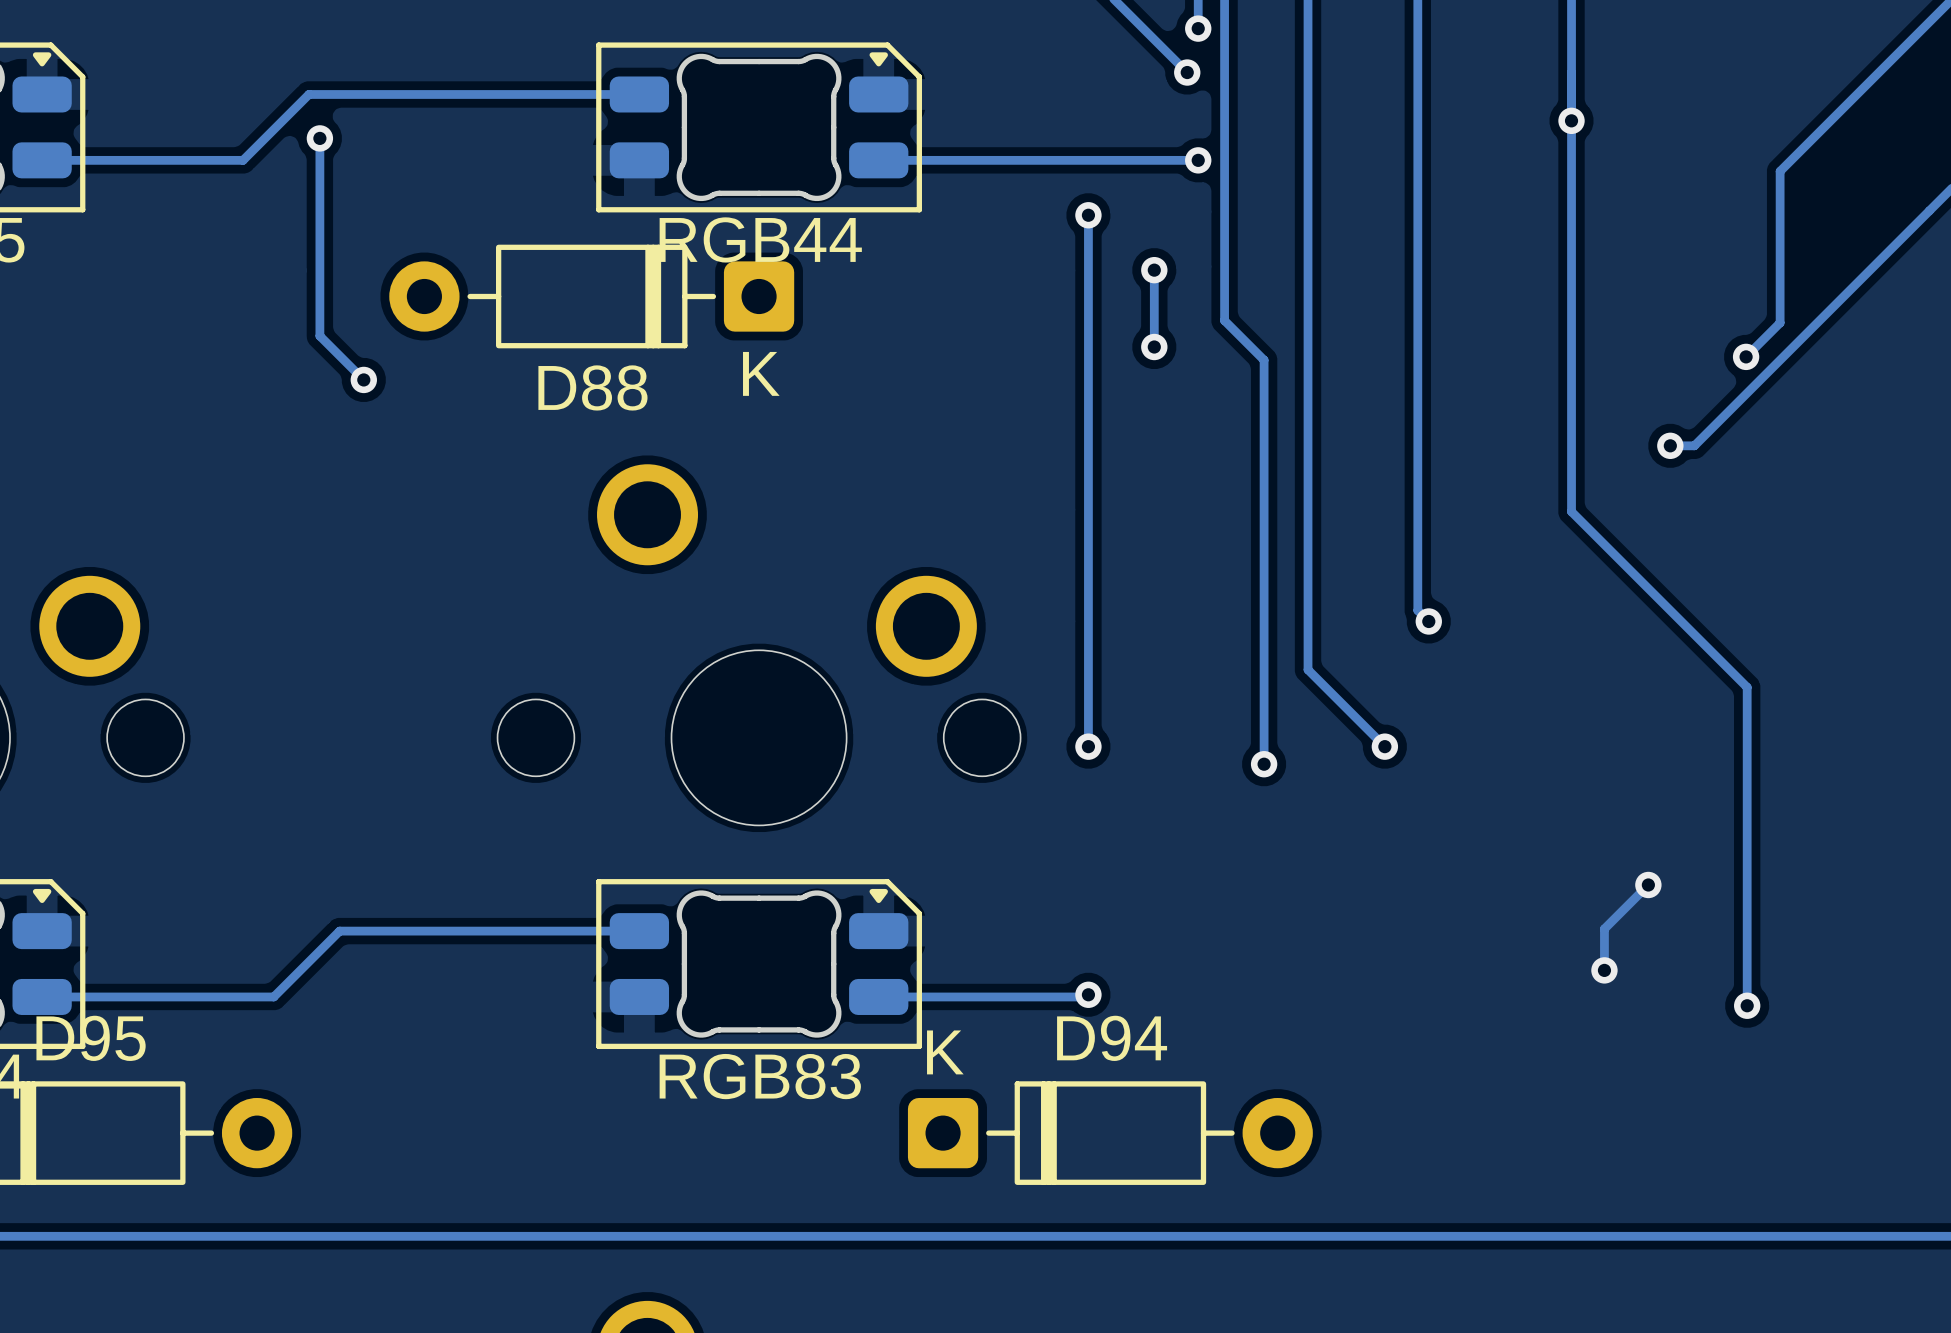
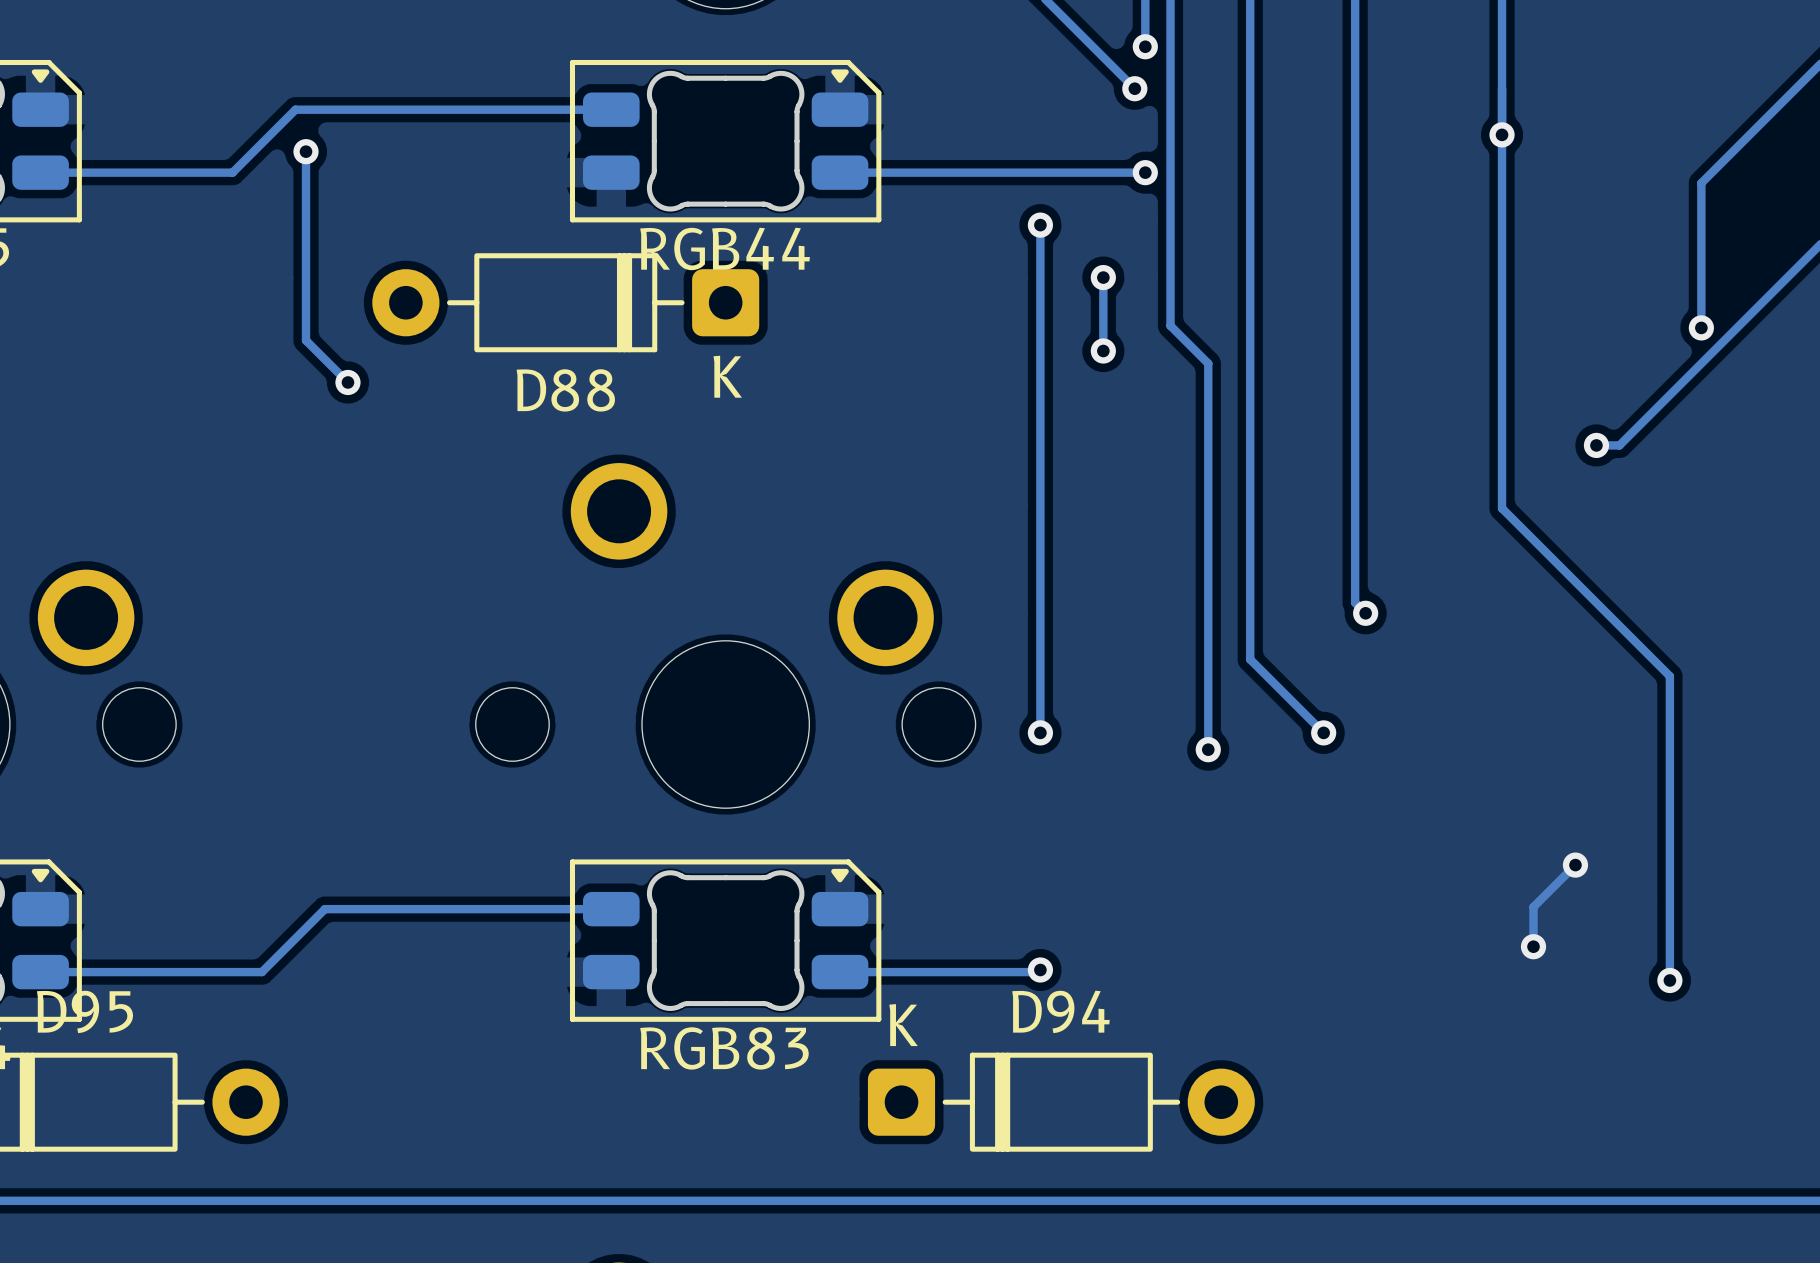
track: (1780, 322) (1746, 356) -> none
via position: (1746, 356) -> (1701, 327)

